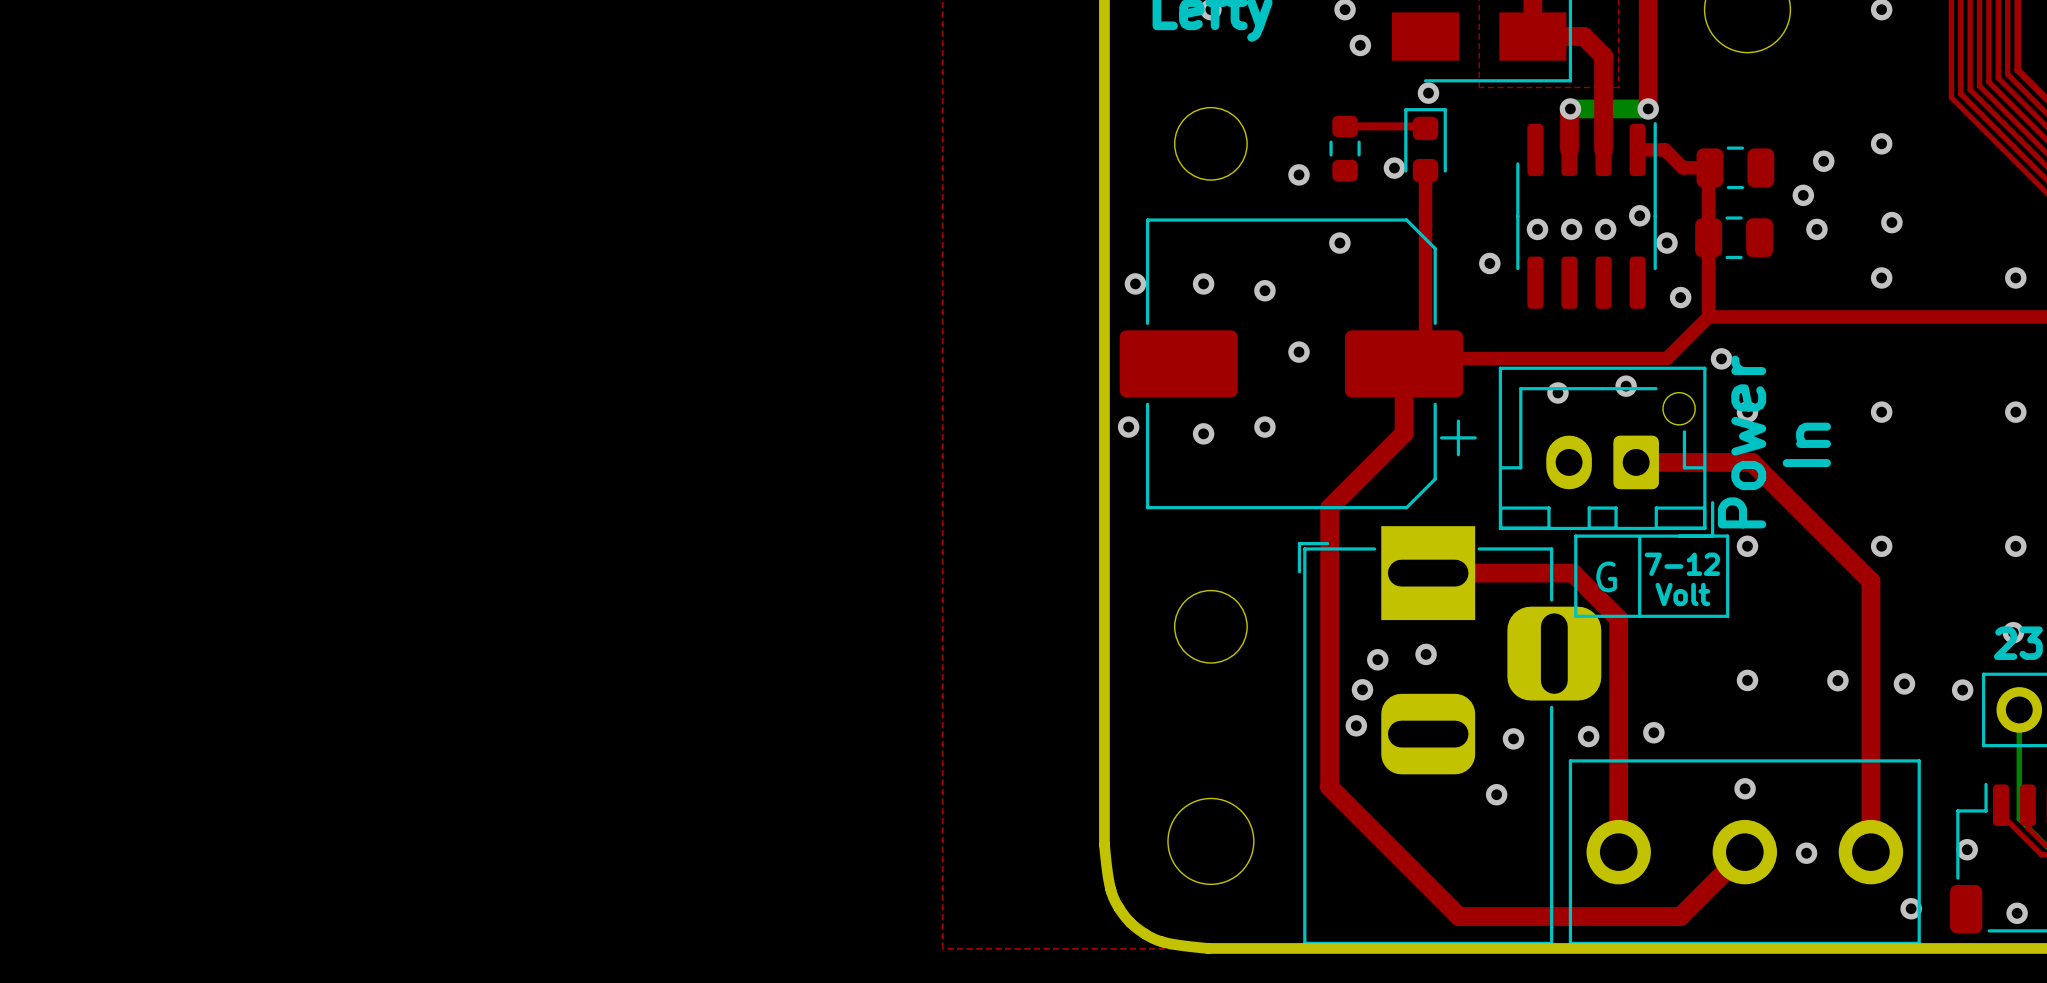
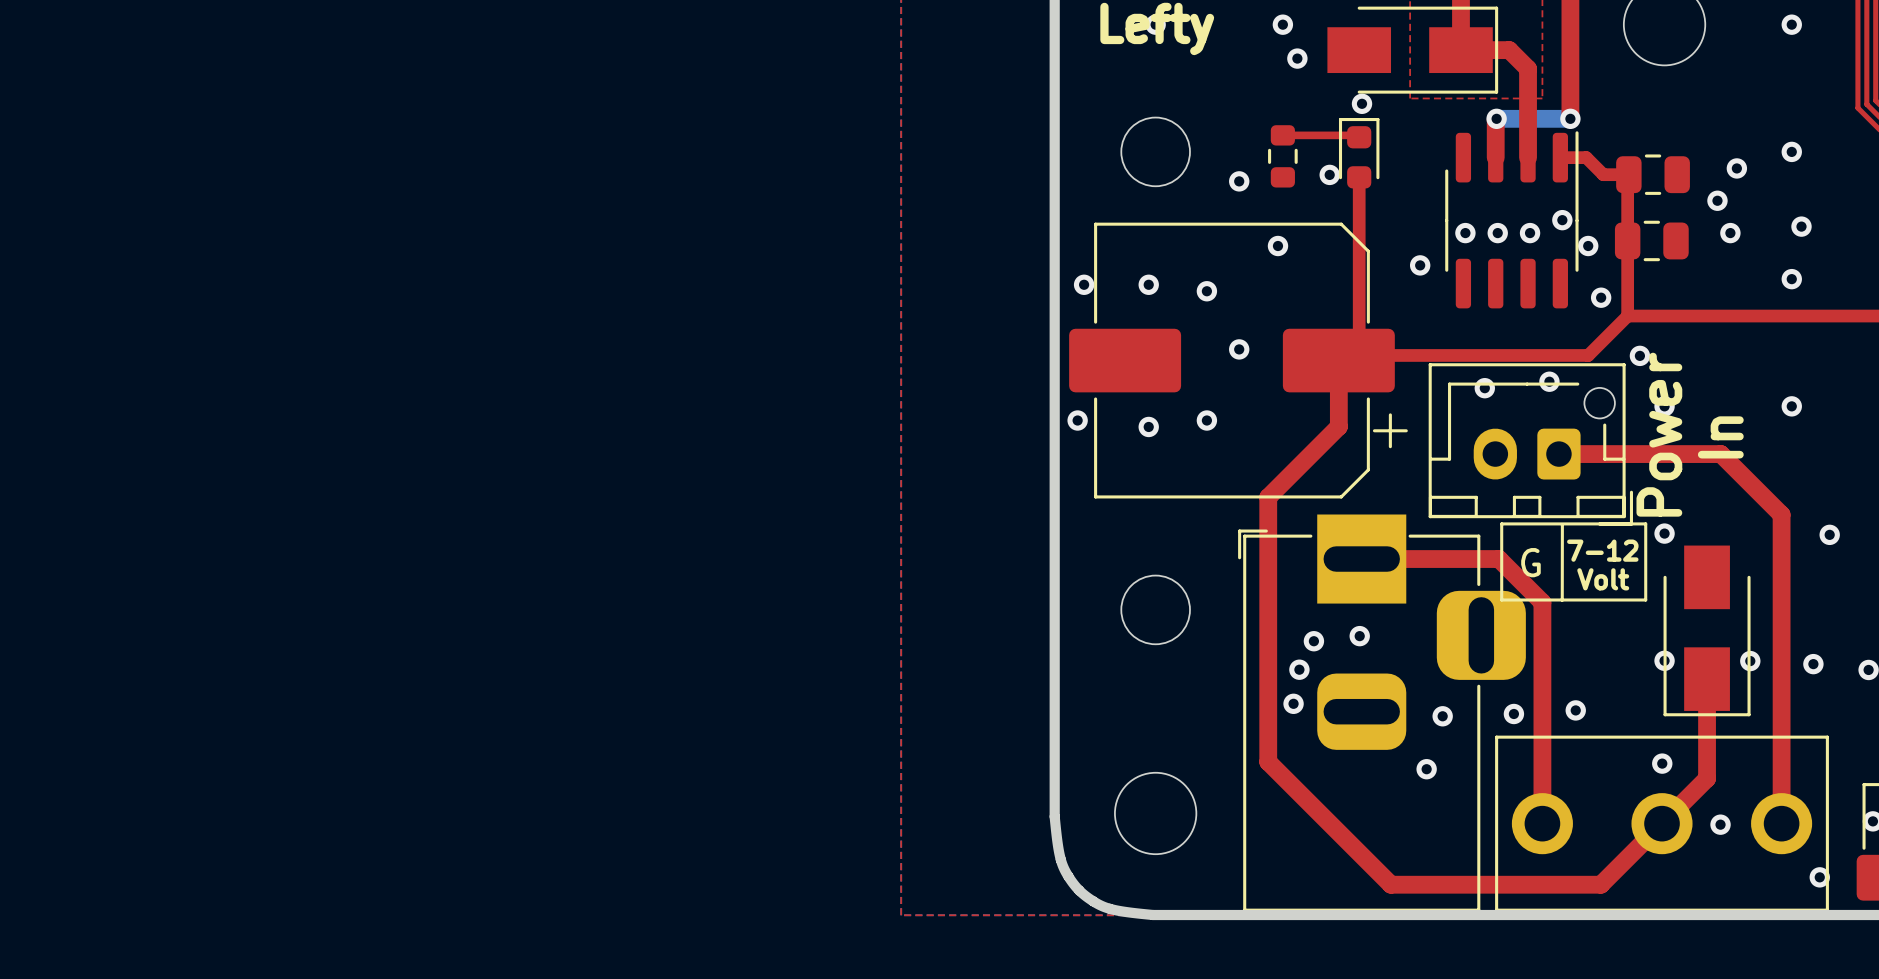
top track: (1752, 462) (1870, 581) -> (1669, 454) (1720, 454) (1781, 514) (1781, 566)
via position: (1881, 546) -> (1829, 534)
part: none -> (1707, 630)
top track: none -> (1707, 679) (1707, 778) (1662, 823)

